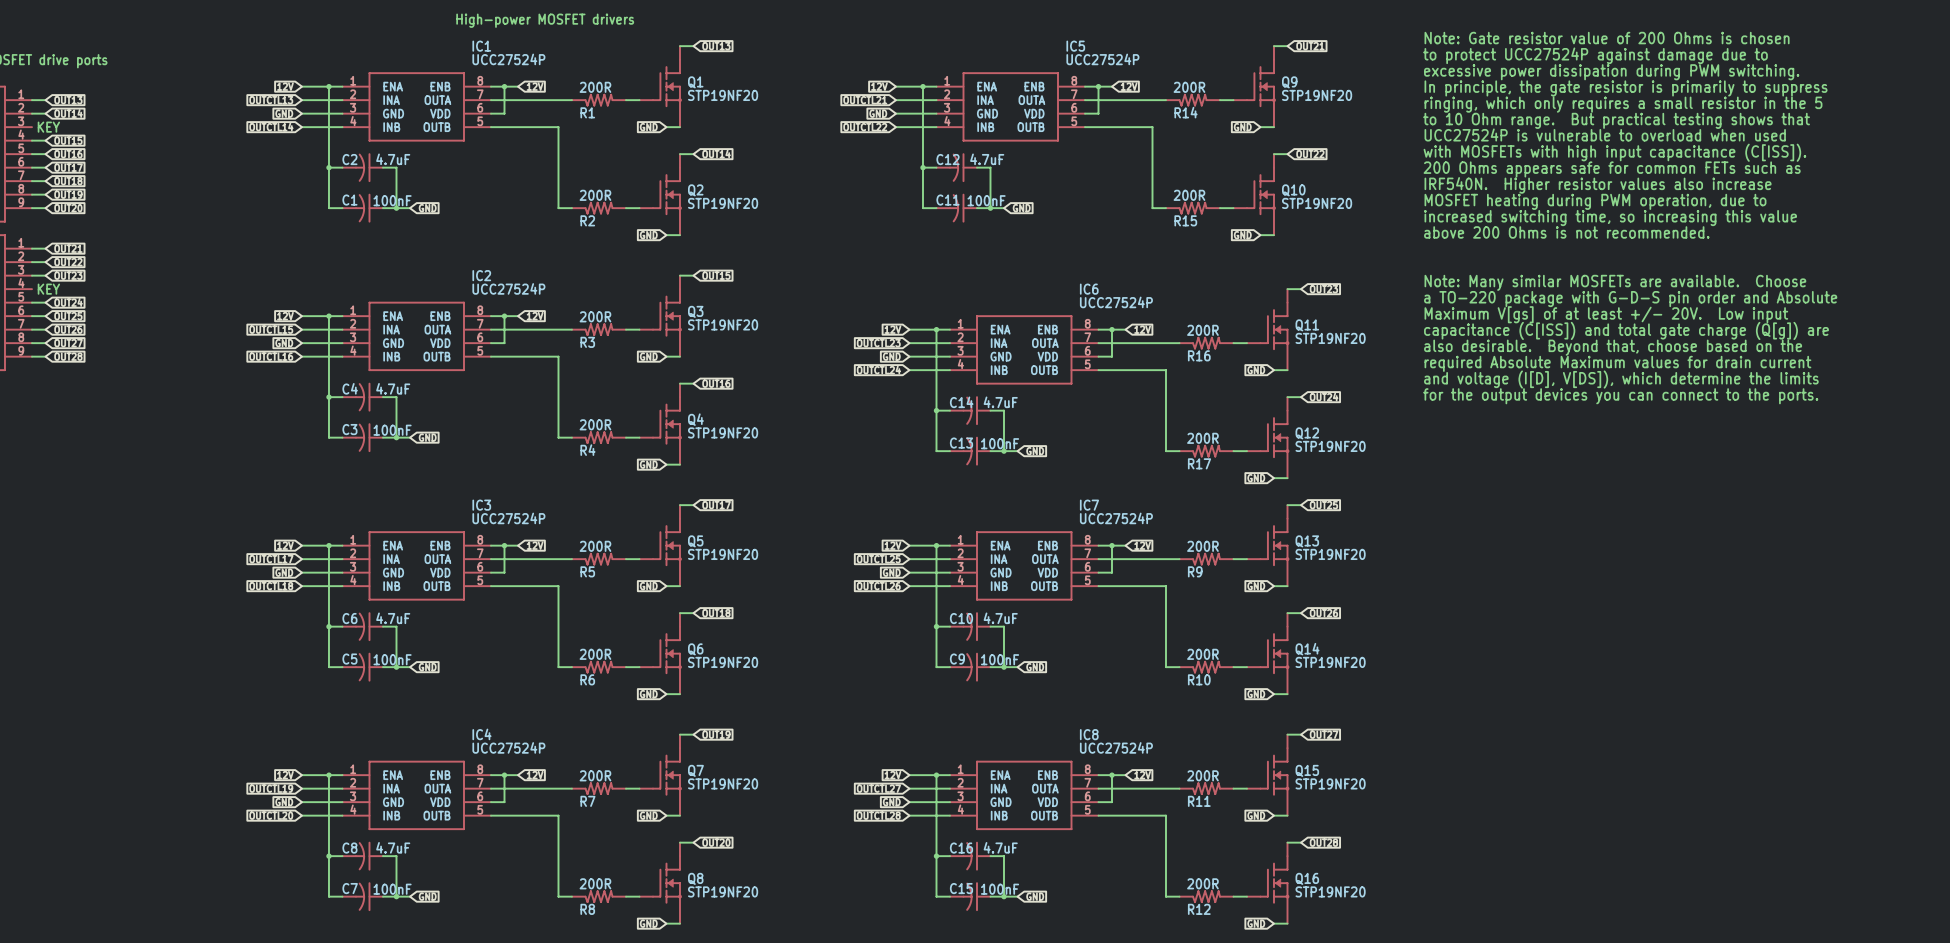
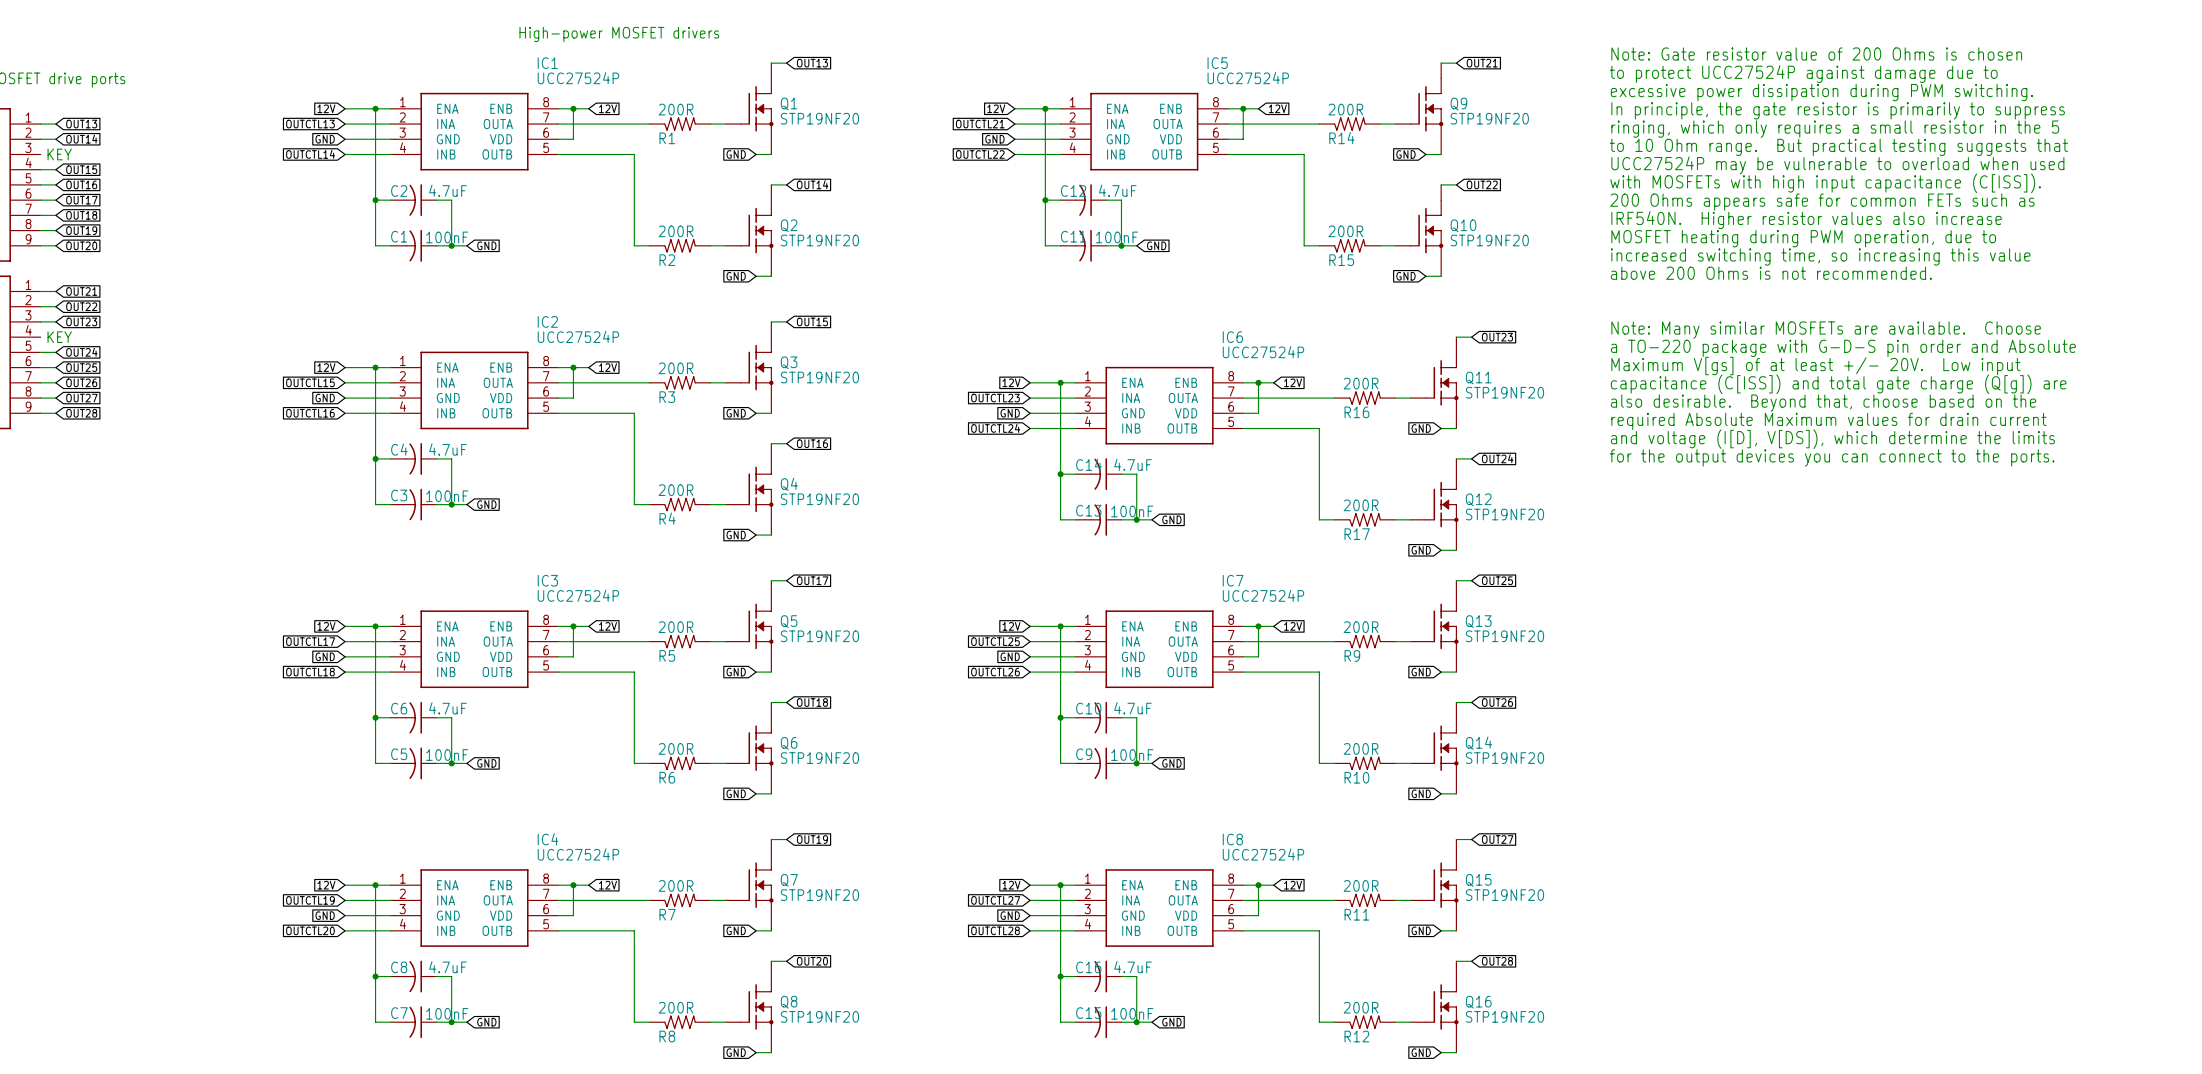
text: to 10 Ohm range. But practical testing shows that (1616, 120) -> to 10 Ohm range. But practical testing suggests that (1838, 147)
text: UCC27524P is vulnerable to overload when used (1605, 134) -> UCC27524P may be vulnerable to overload when used (1837, 165)

